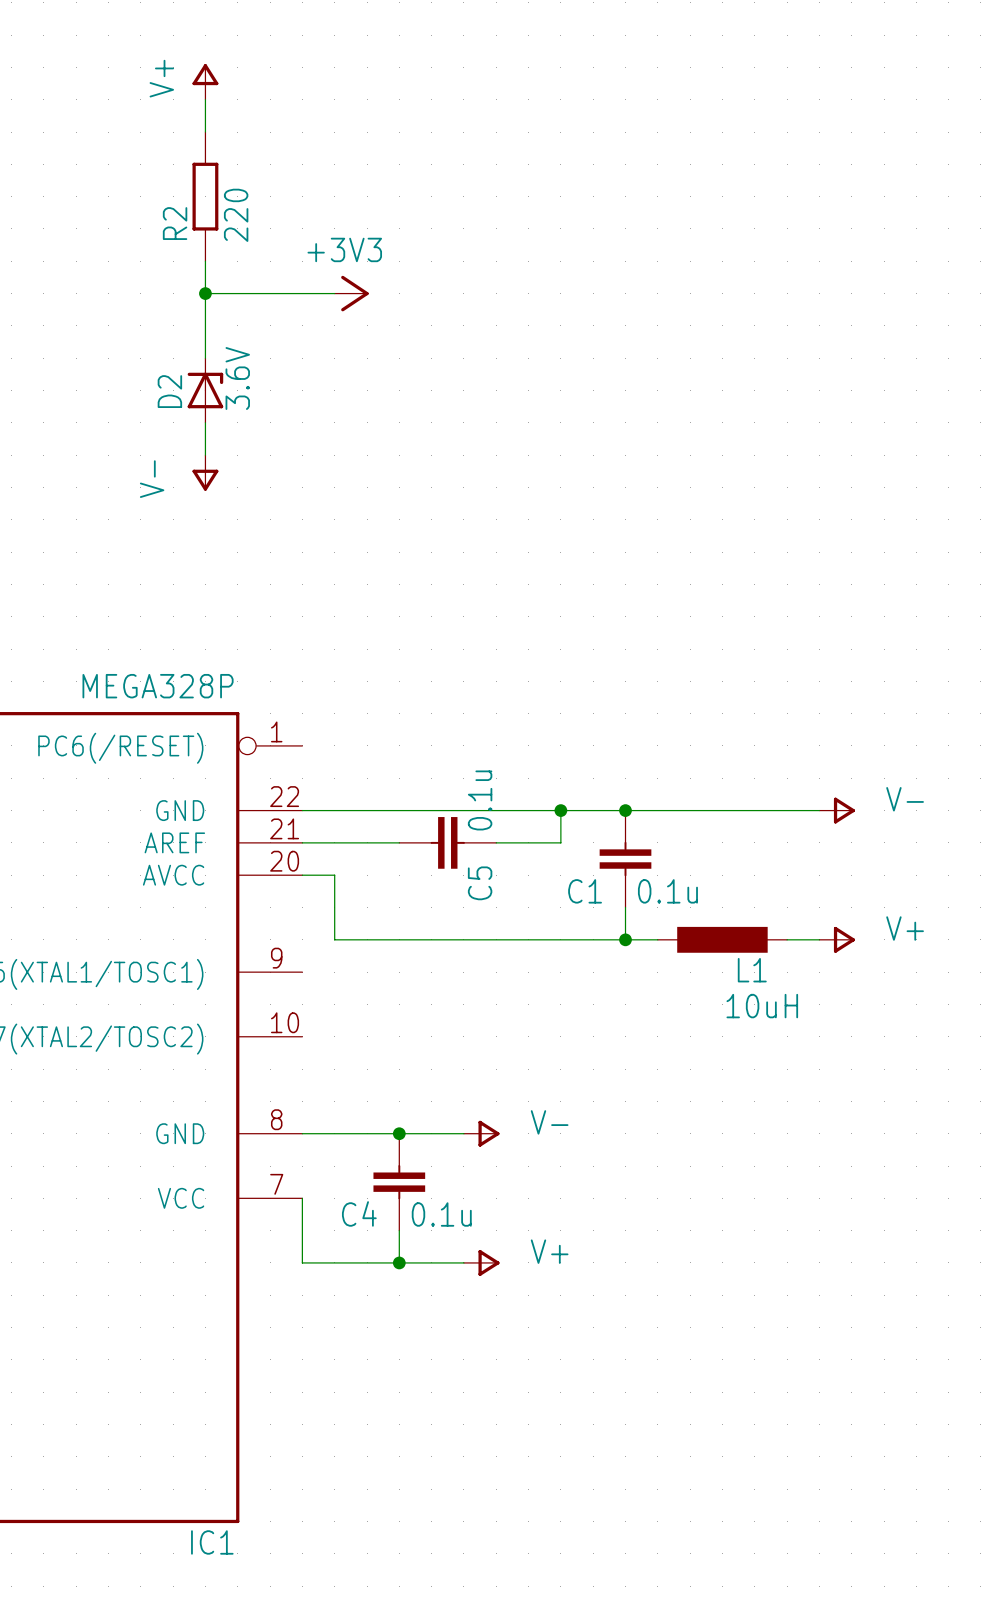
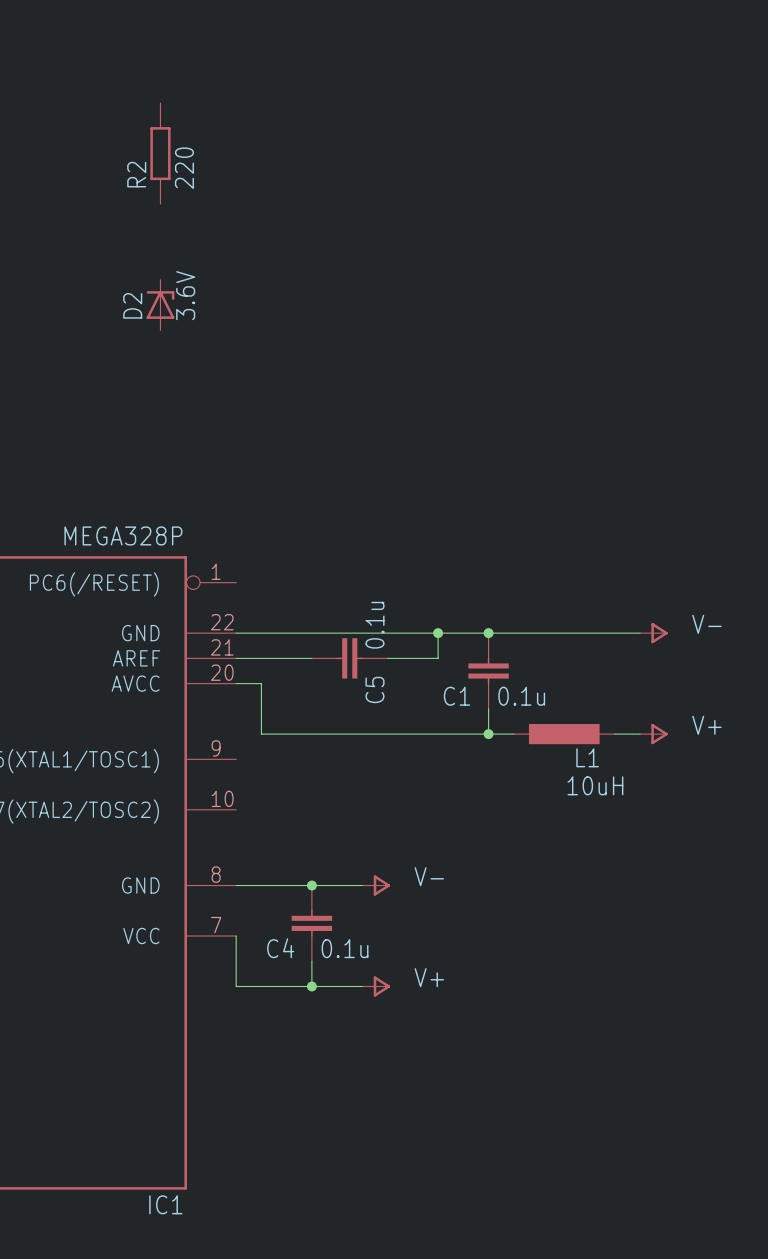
power symbol: V+ (205, 81) -> none
wire: (205, 99) (205, 132) -> none
wire: (205, 261) (205, 358) -> none
wire: (205, 293) (334, 293) -> none
junction: (205, 293) -> none
power symbol: +3V3 (351, 293) -> none
wire: (205, 422) (205, 455) -> none
power symbol: V- (205, 472) -> none

